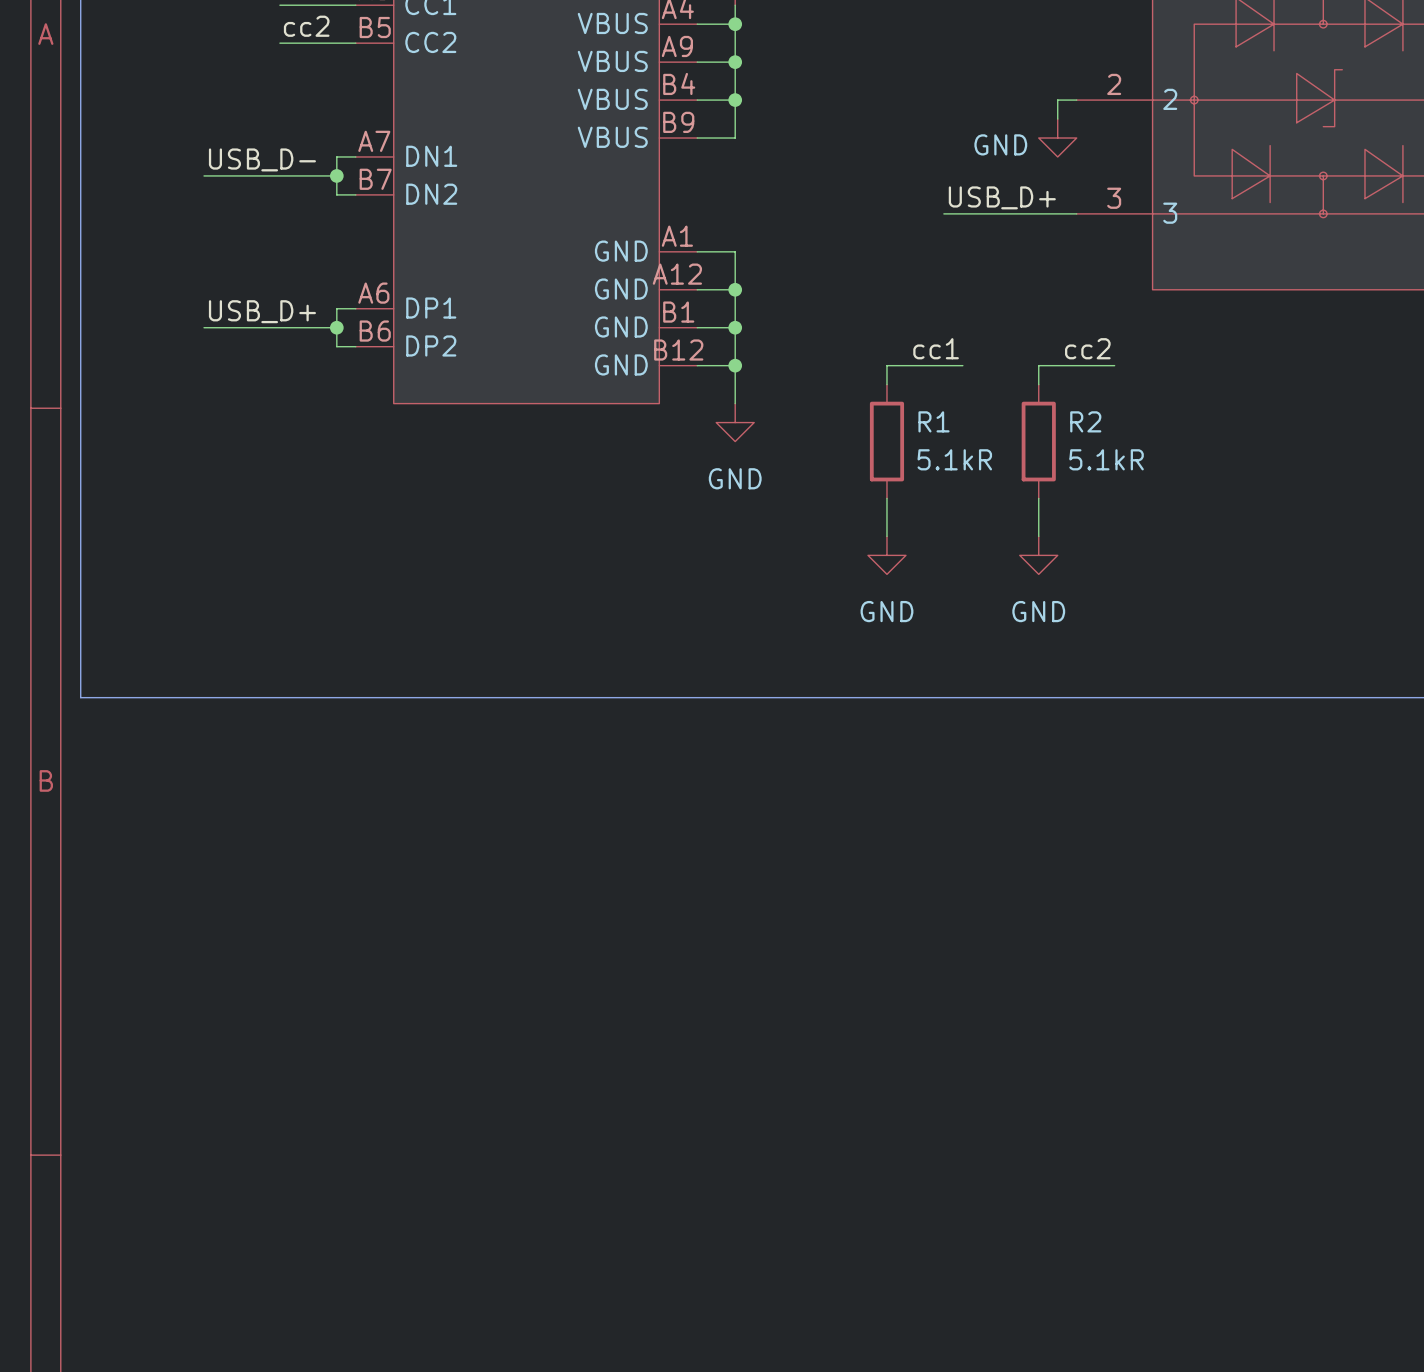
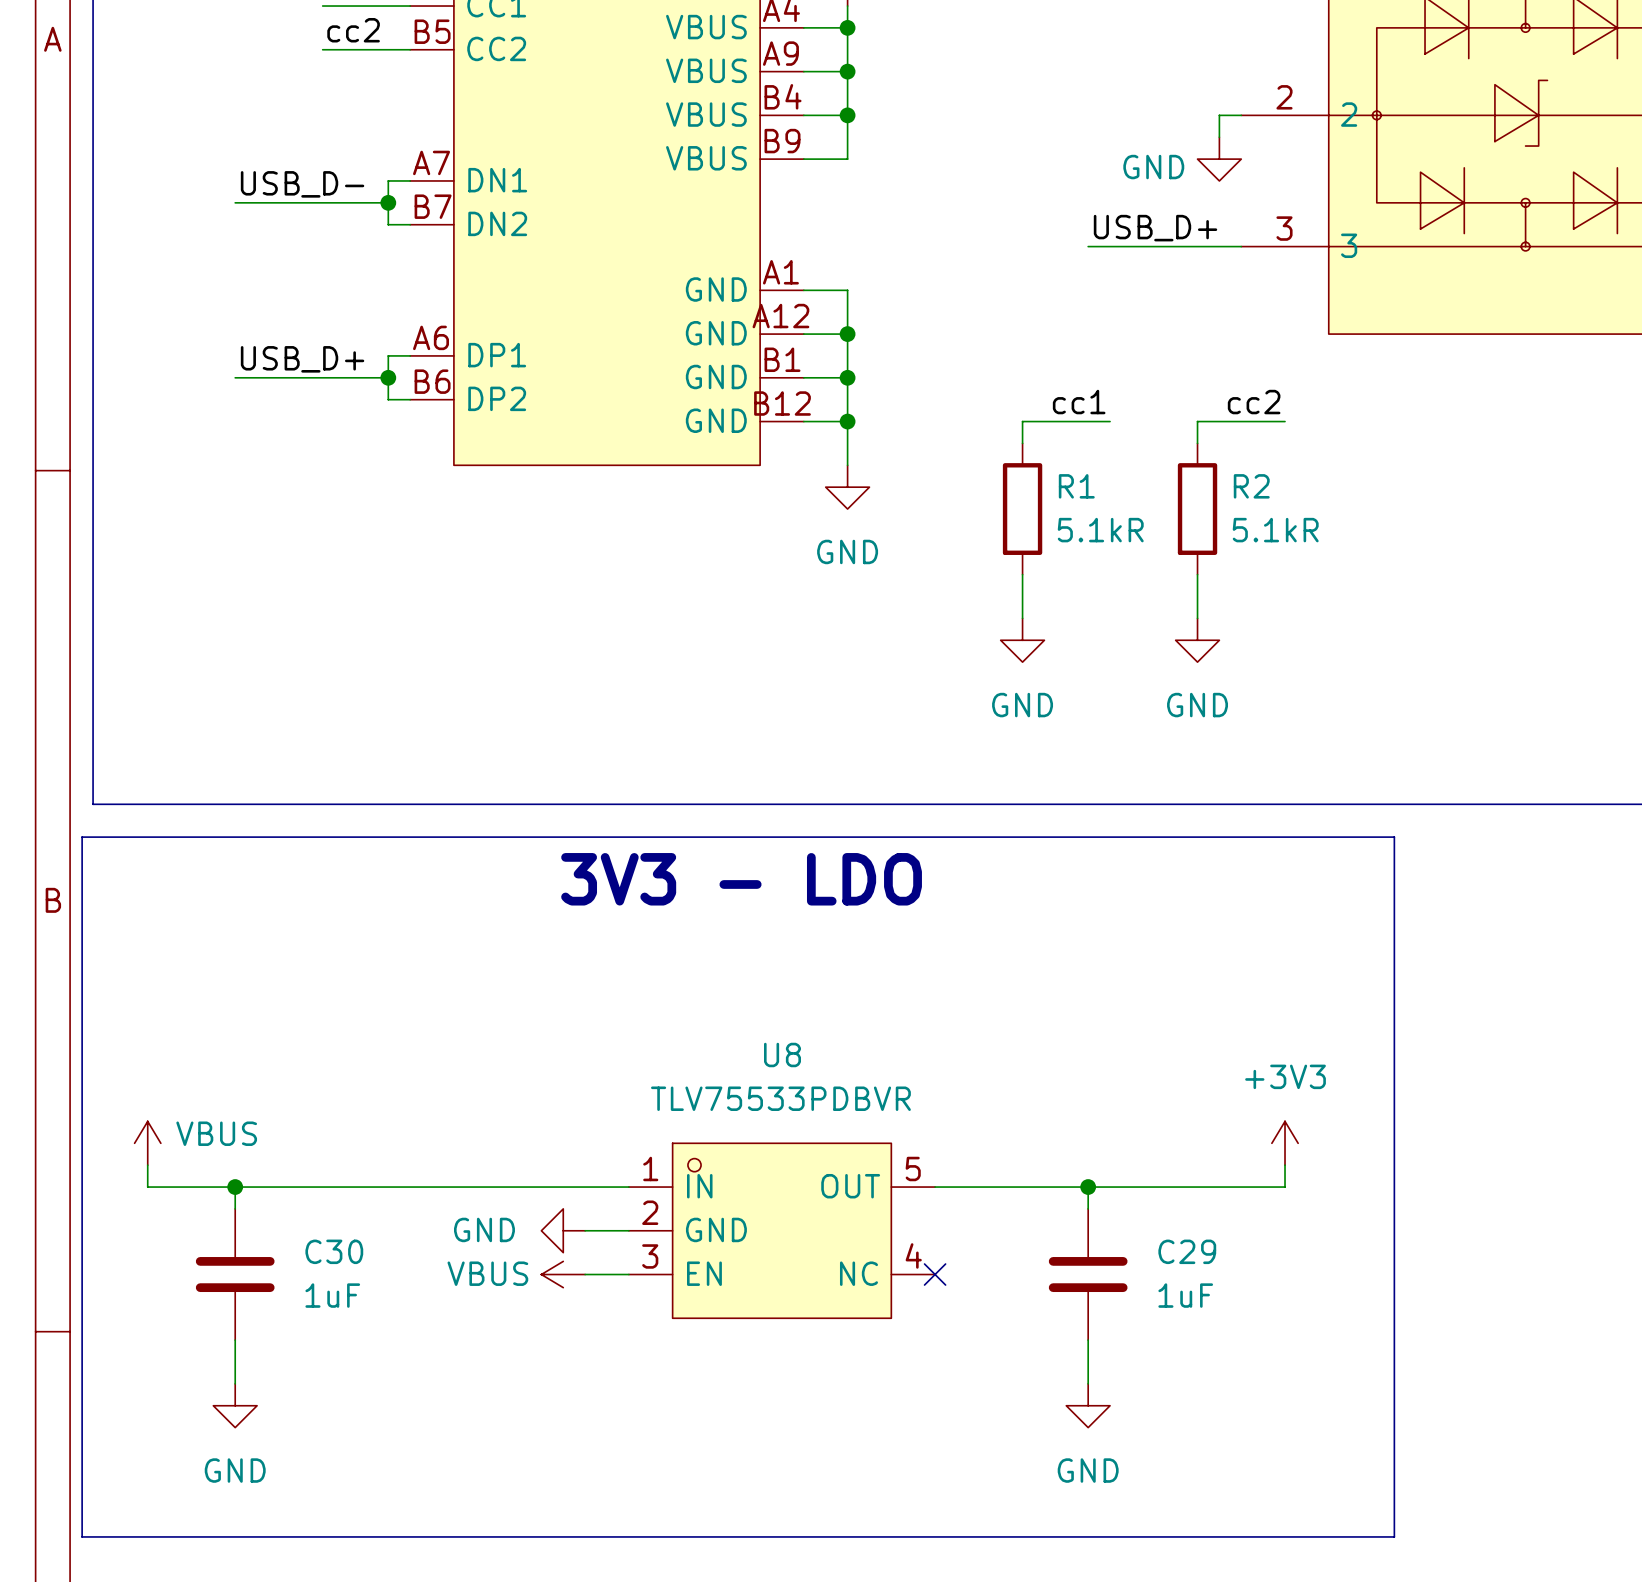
line: none -> (82, 837) (1394, 837) (1394, 1536) (82, 1536) (82, 837)
text: none -> 3V3 - LDO (741, 879)
power symbol: none -> VBUS (147, 1143)
power symbol: none -> +3V3 (1285, 1143)
wire: none -> (147, 1165) (147, 1187) (628, 1187)
wire: none -> (1285, 1165) (1285, 1187) (935, 1187)
wire: none -> (235, 1187) (235, 1208)
junction: none -> (235, 1187)
wire: none -> (1088, 1187) (1088, 1208)
junction: none -> (1088, 1187)
power symbol: none -> GND (563, 1230)
wire: none -> (585, 1230) (628, 1230)
U8: none -> TLV75533PDBVR (781, 1230)
C30: none -> 1uF (235, 1274)
power symbol: none -> VBUS (563, 1274)
wire: none -> (585, 1274) (628, 1274)
no-connect mark: none -> (935, 1274)
C29: none -> 1uF (1088, 1274)
wire: none -> (235, 1340) (235, 1383)
wire: none -> (1088, 1340) (1088, 1383)
power symbol: none -> GND (235, 1405)
power symbol: none -> GND (1088, 1405)

